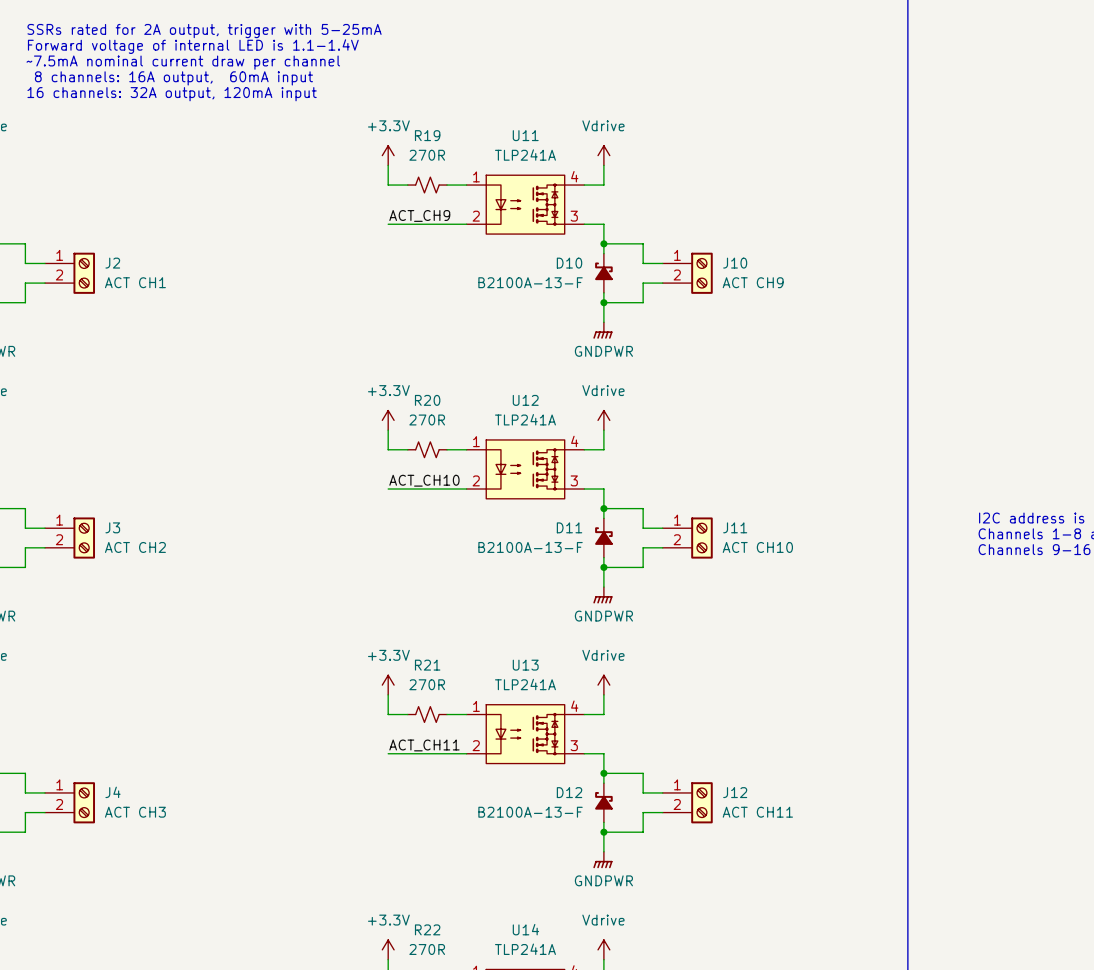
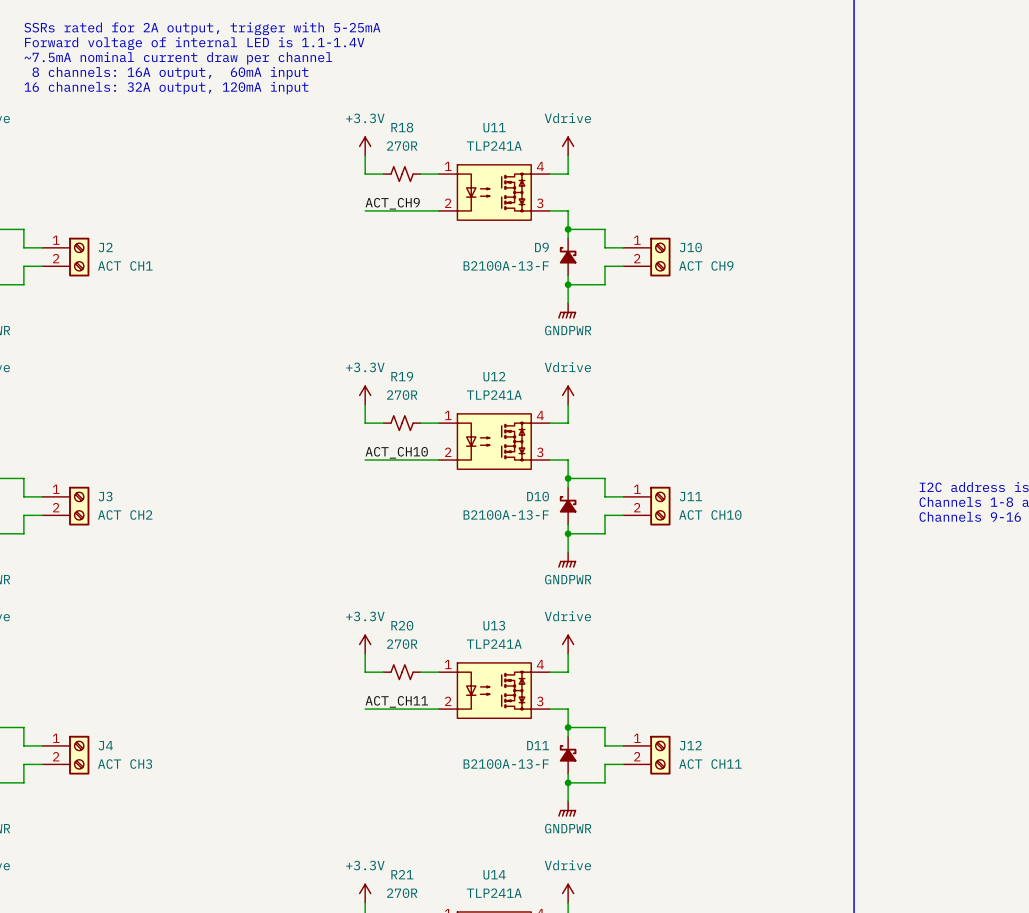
R19 name: R19 (427, 135) -> R18 (402, 127)
D10 name: D10 (569, 263) -> D9 (541, 247)
R20 name: R20 (427, 400) -> R19 (402, 376)
D11 name: D11 (569, 527) -> D10 (538, 496)
R21 name: R21 (427, 665) -> R20 (402, 625)
D12 name: D12 (569, 792) -> D11 (538, 745)
R22 name: R22 (427, 929) -> R21 (402, 874)

